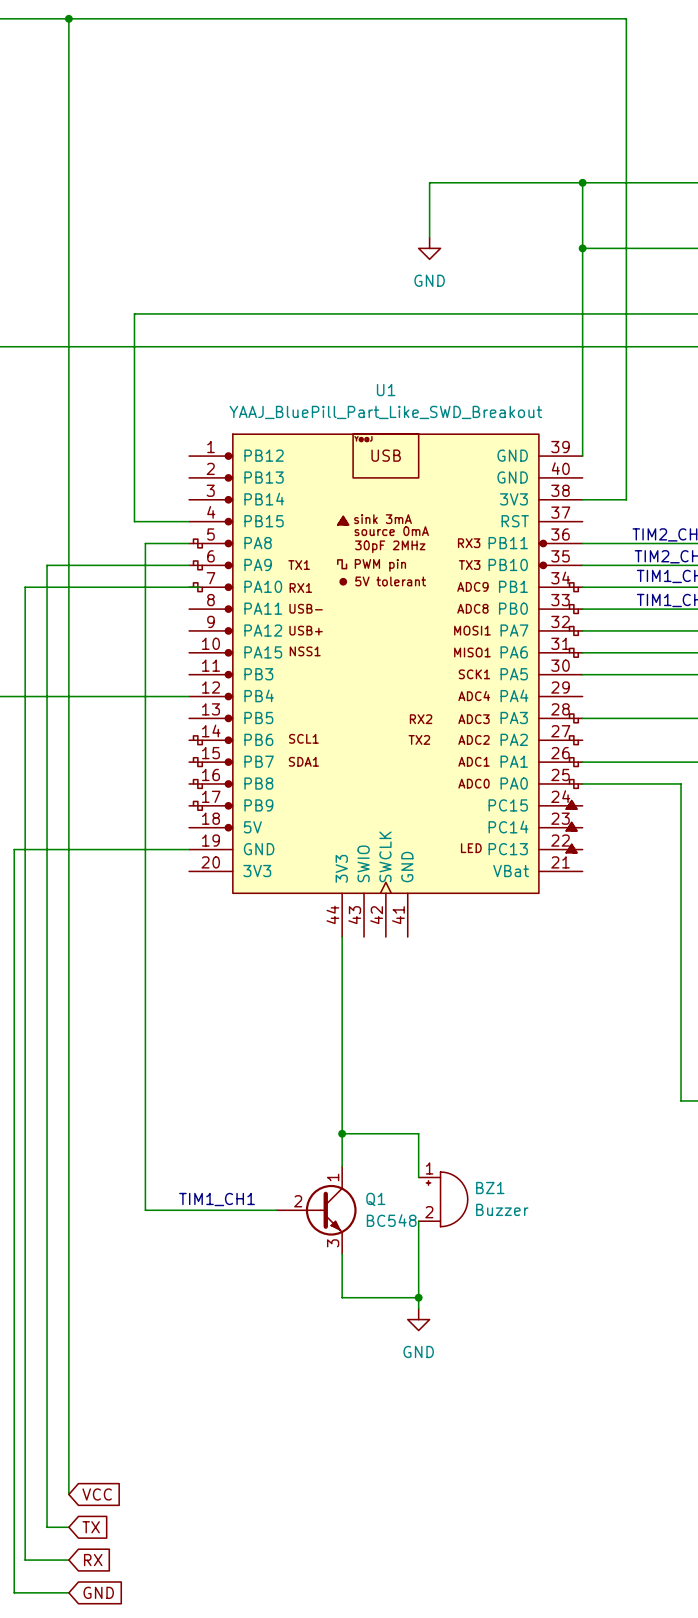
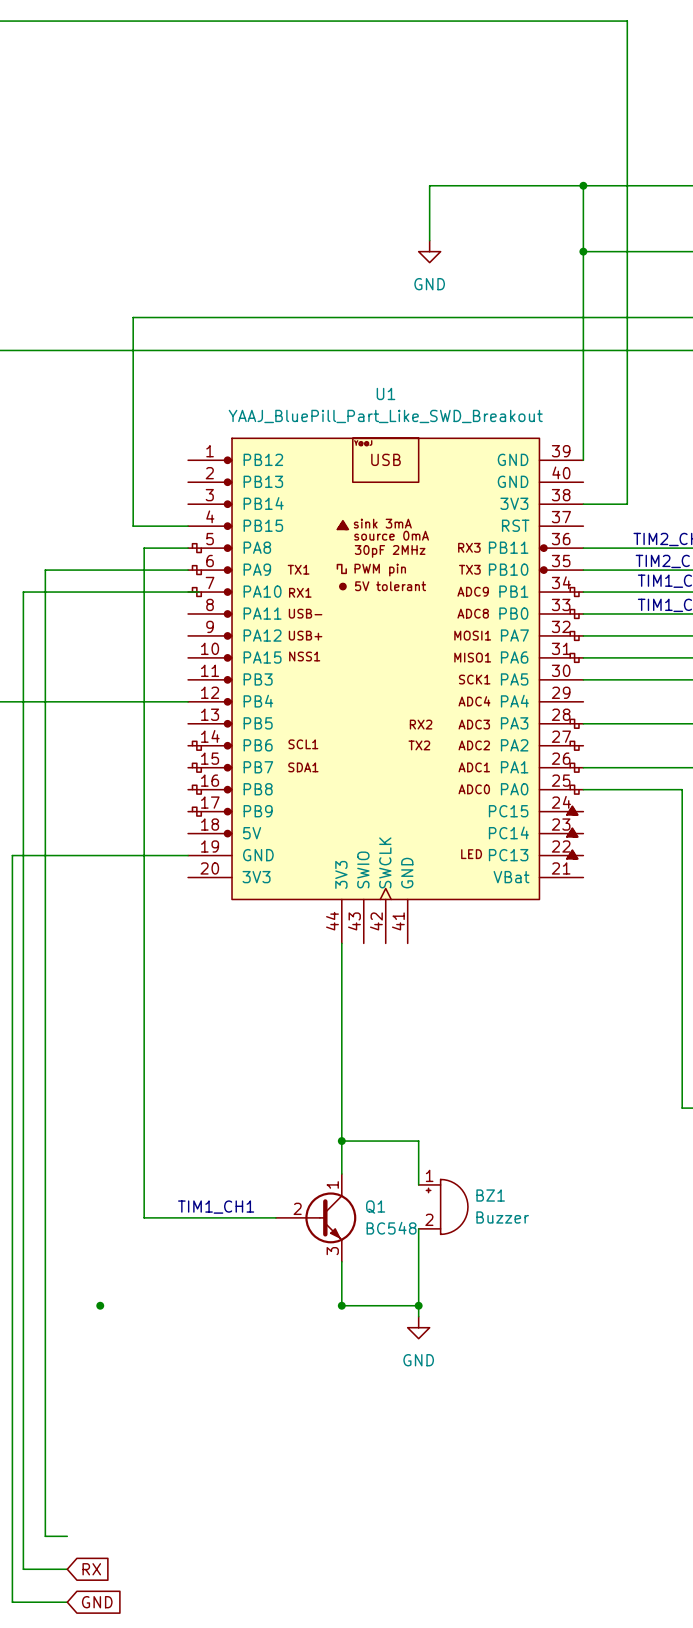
wire: (68, 18) (68, 1494) -> none
junction: (68, 18) -> none
junction: none -> (100, 1305)
junction: none -> (341, 1305)
global label: VCC (97, 1494) -> none
global label: TX (91, 1527) -> none

